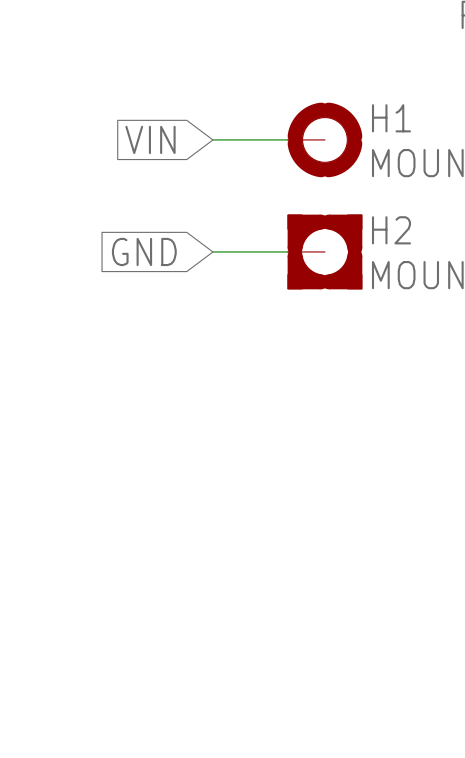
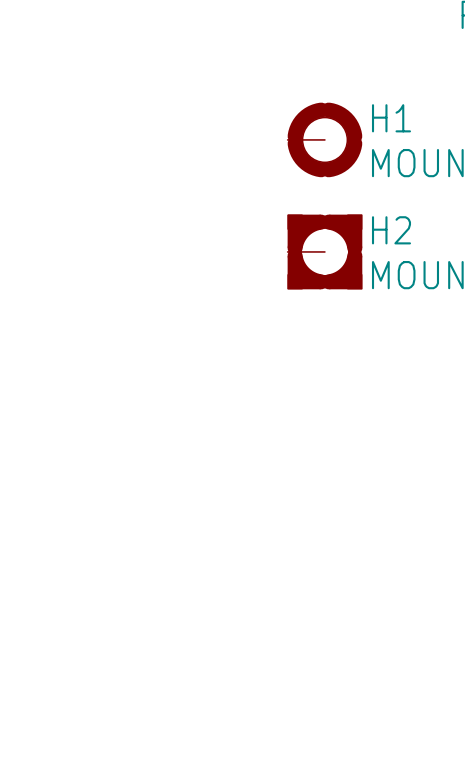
global label: VIN (150, 139) -> none
wire: (212, 139) (287, 139) -> none
global label: GND (144, 251) -> none
wire: (212, 251) (287, 251) -> none

